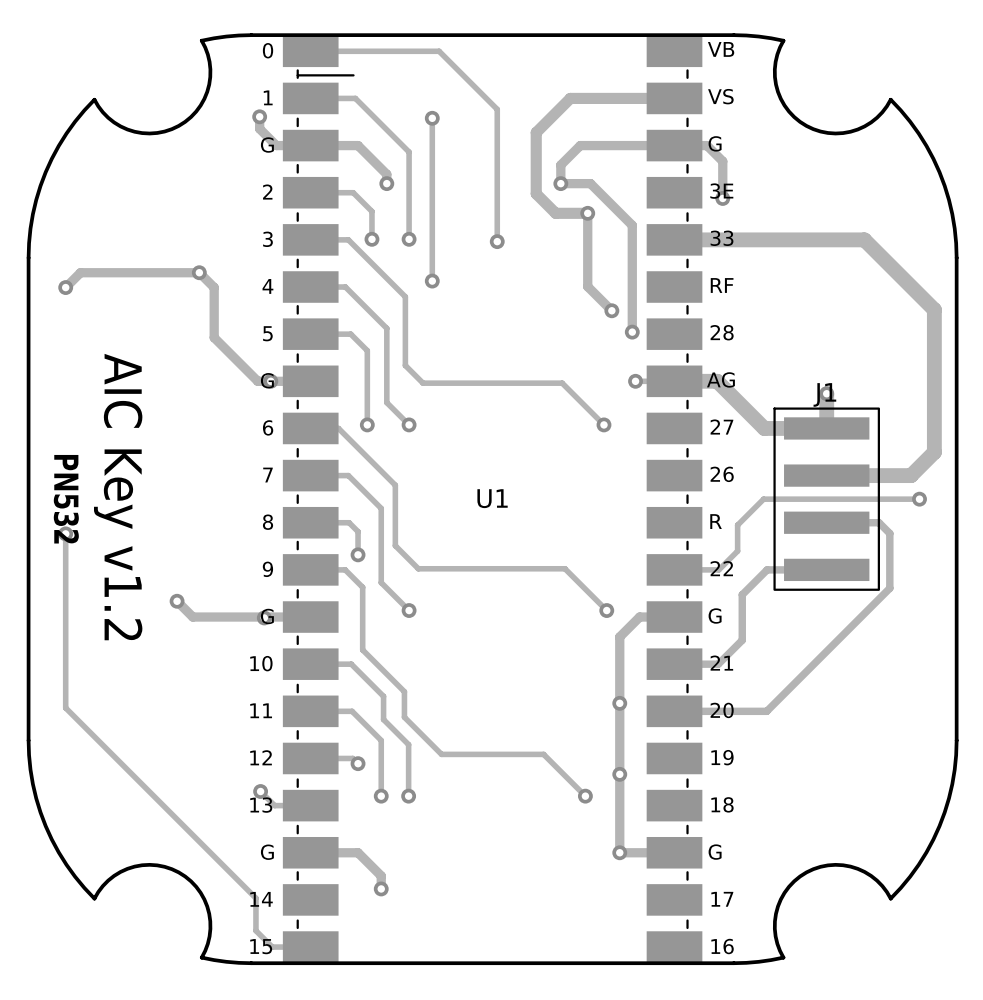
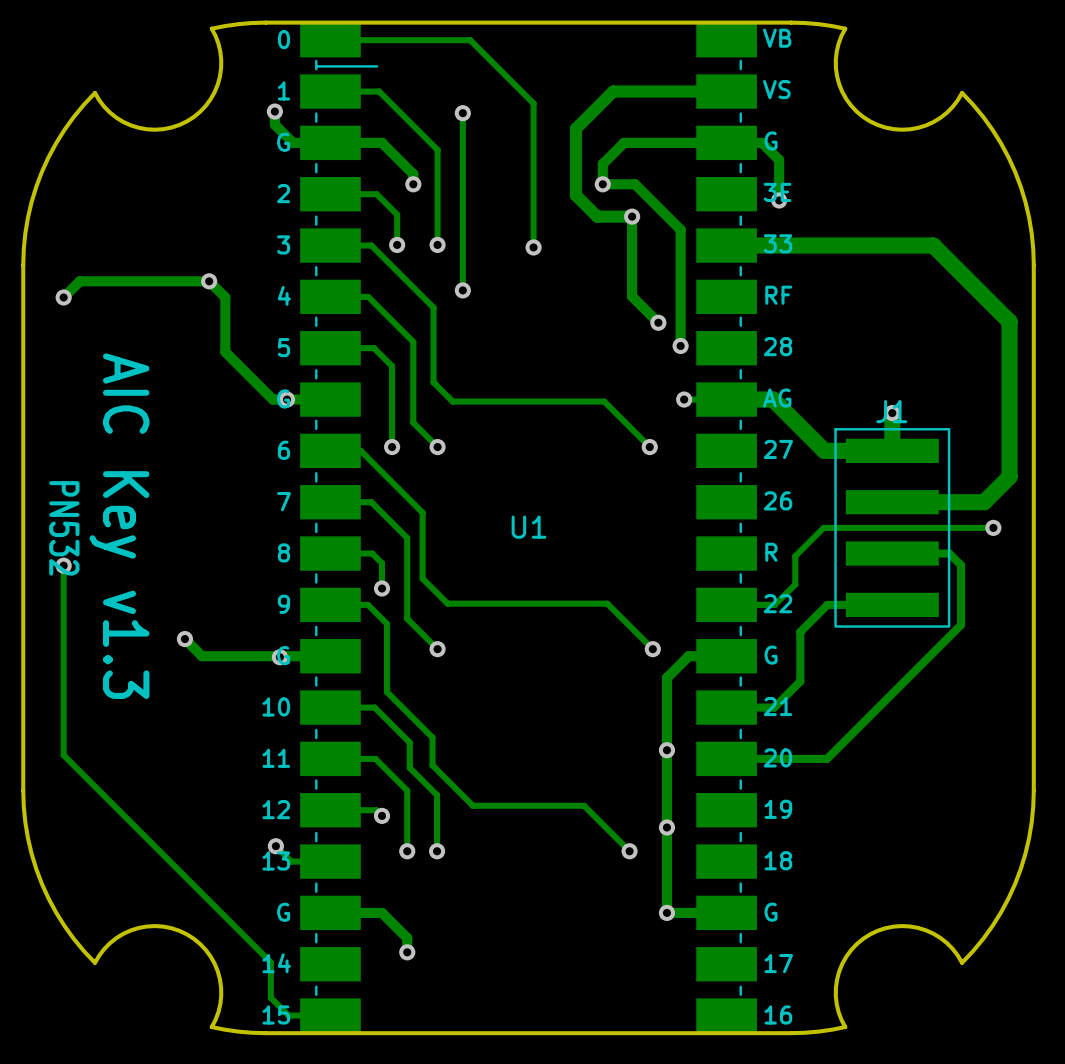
text: AIC Key v1.2 (118, 497) -> AIC Key v1.3 (119, 526)

